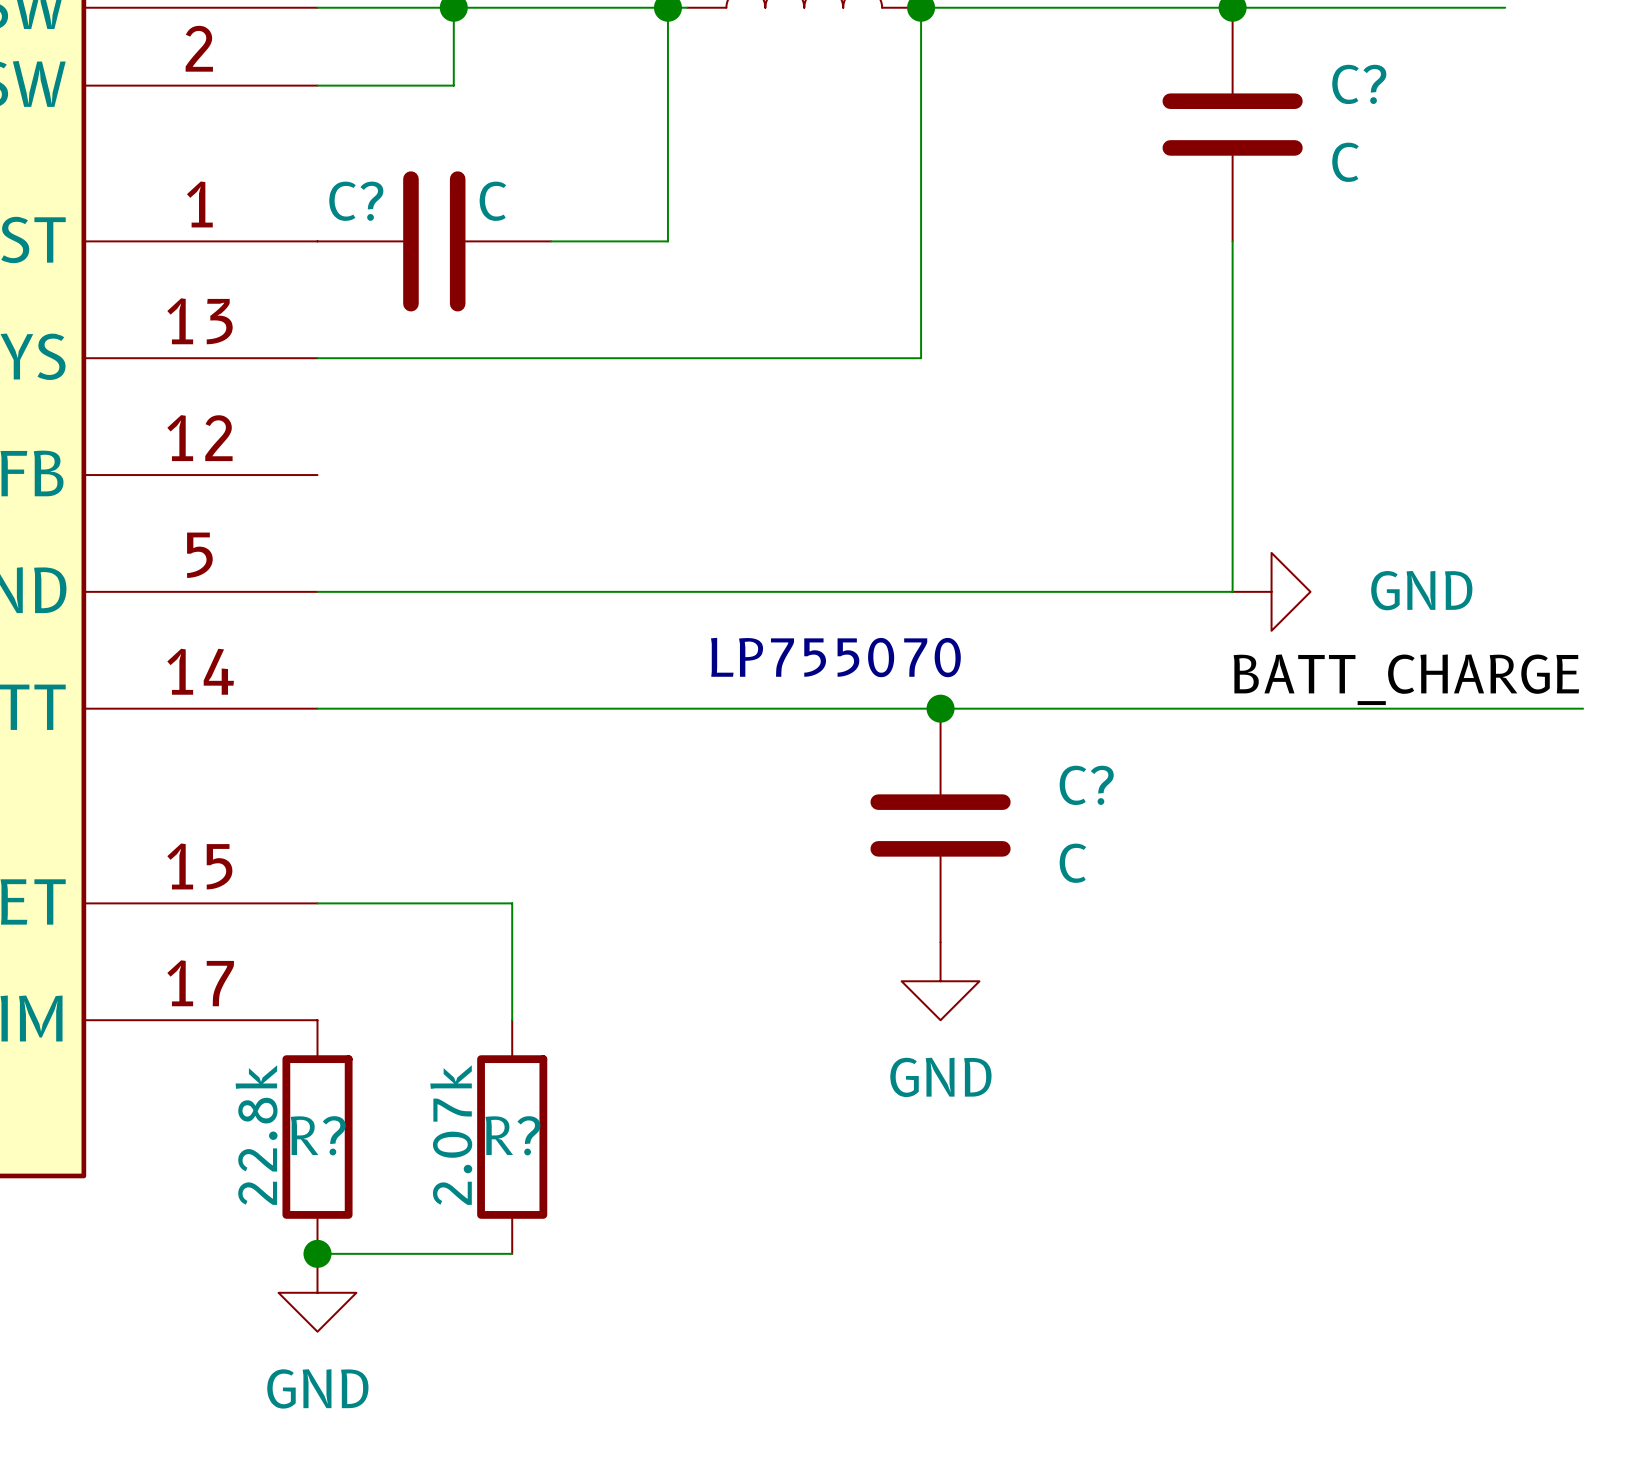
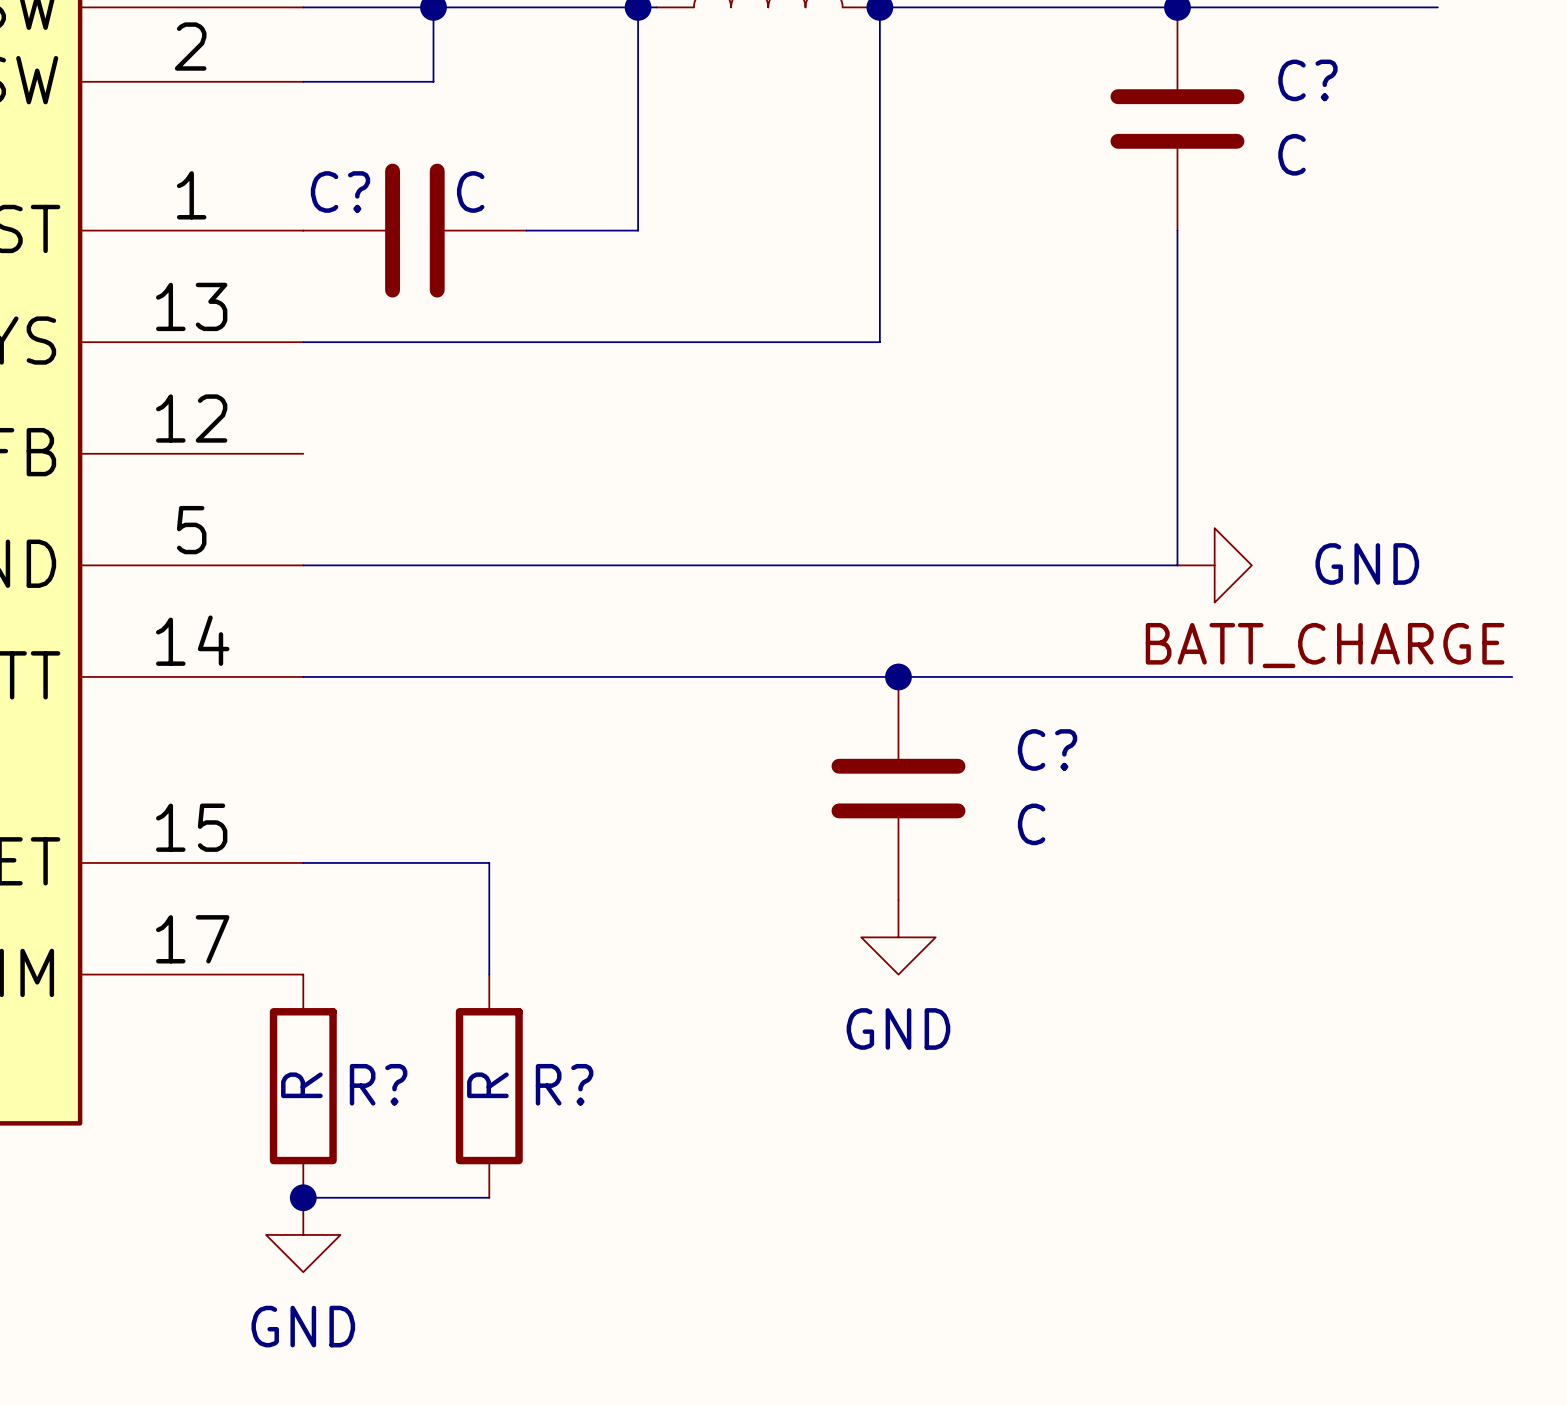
text: LP755070 (835, 657) -> none
R? value: 22.8k (256, 1135) -> R (301, 1085)
R? name position: R? (318, 1135) -> R? (378, 1084)
R? value: 2.07k (451, 1135) -> R (487, 1085)
R? name position: R? (512, 1135) -> R? (564, 1084)

